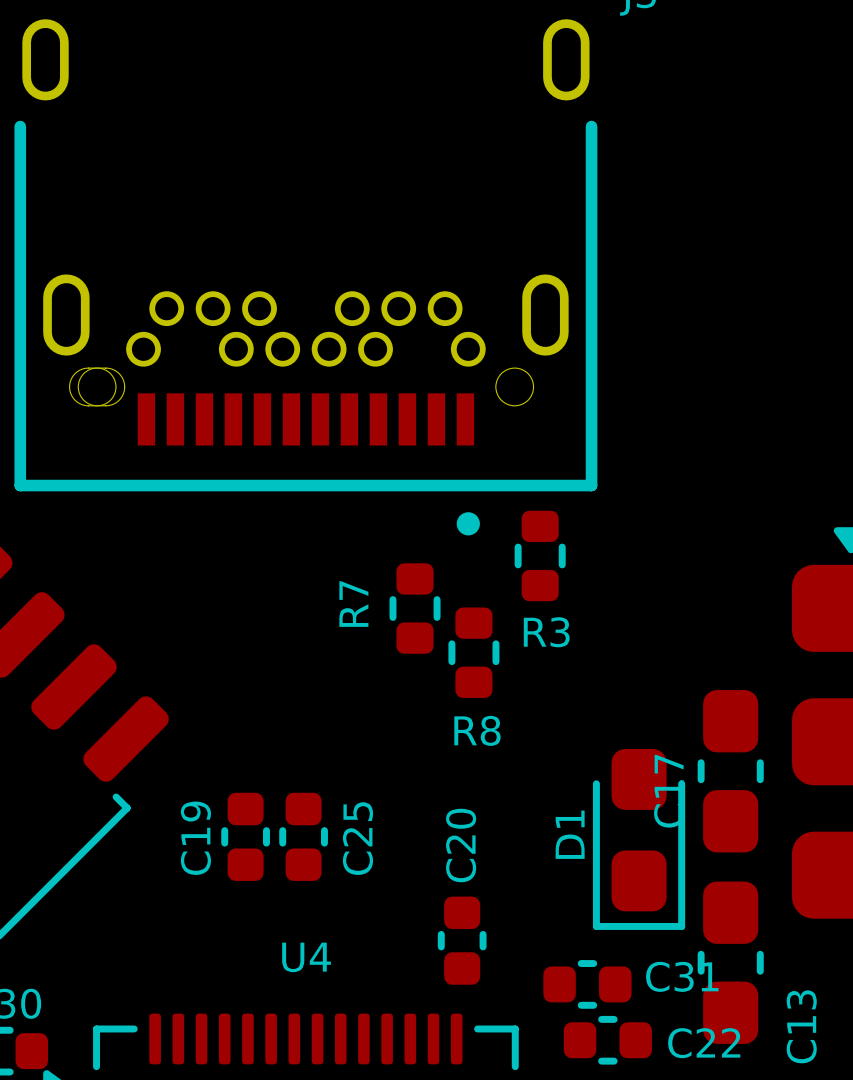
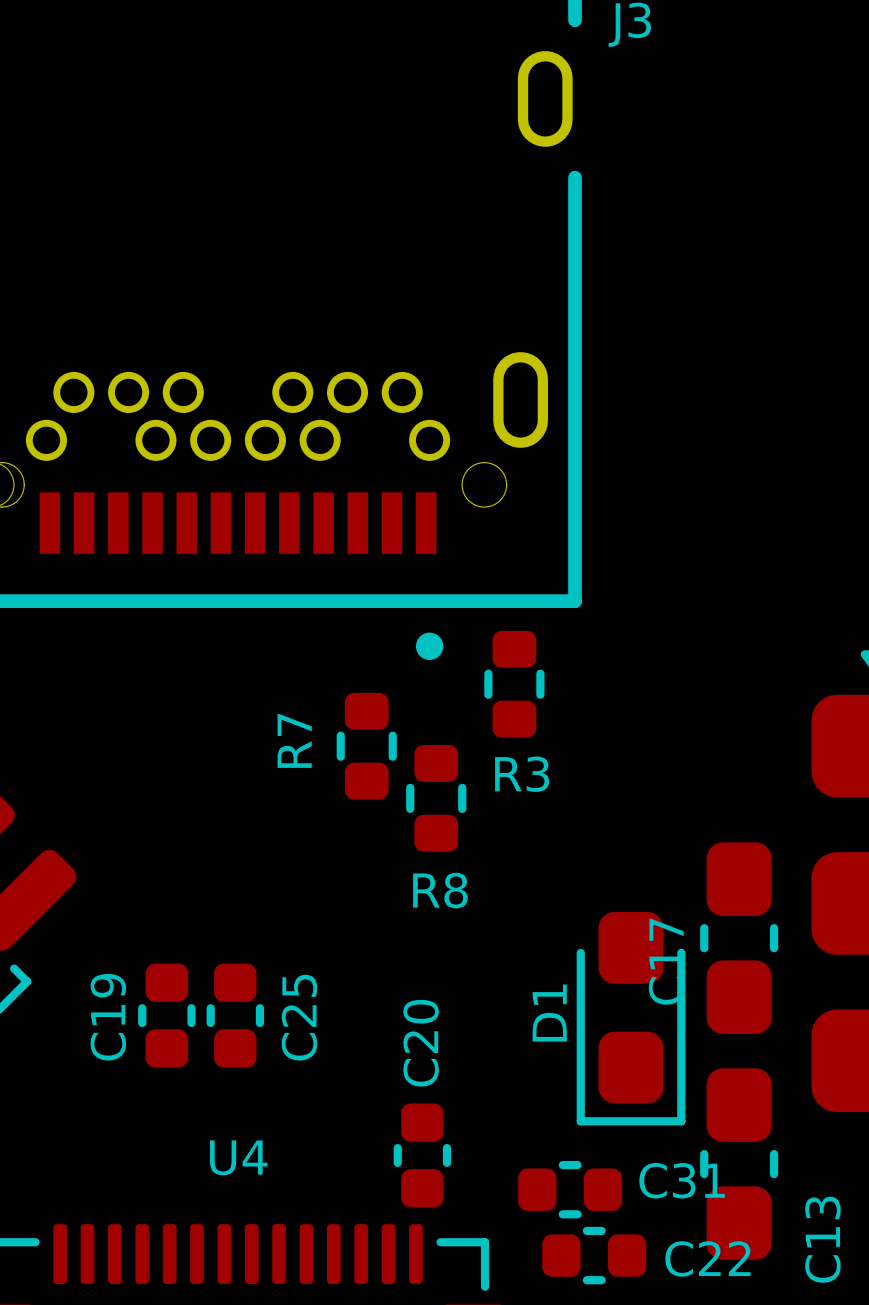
C20 position: (462, 940) -> (422, 1155)

